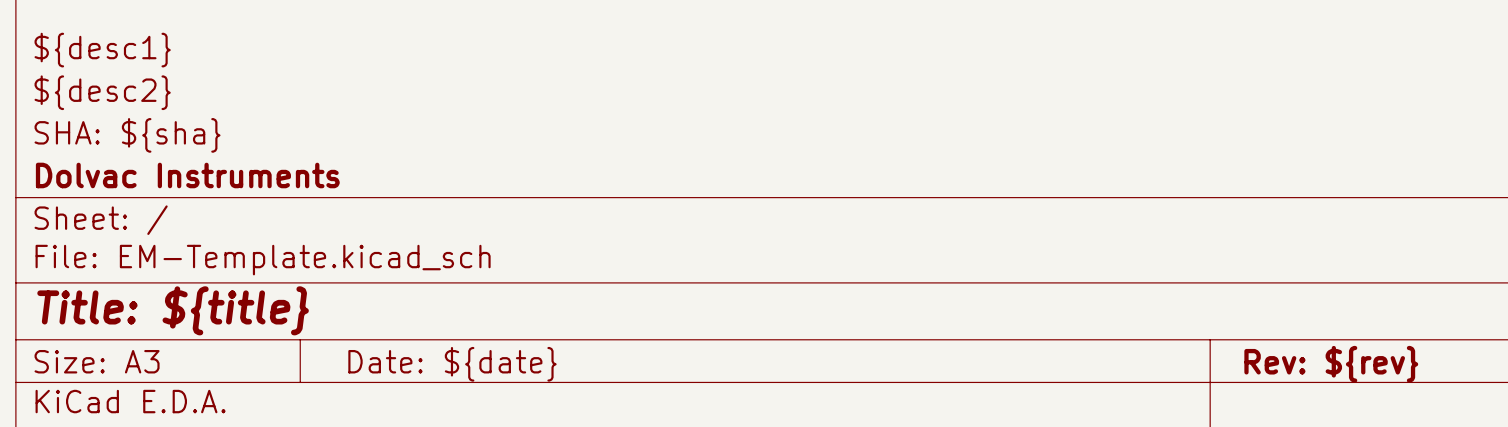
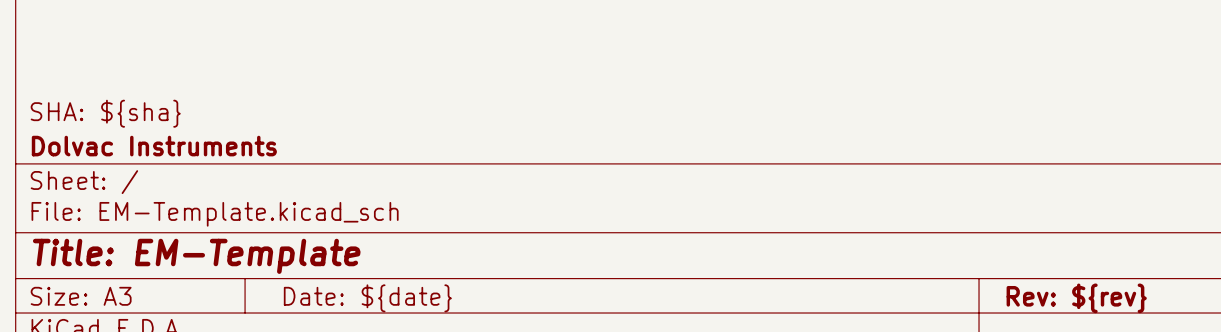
title block: ${desc1} (102, 50) -> none
title block: ${desc2} (102, 92) -> none
title block: Title: ${title} (173, 310) -> Title: EM-Template (196, 256)

